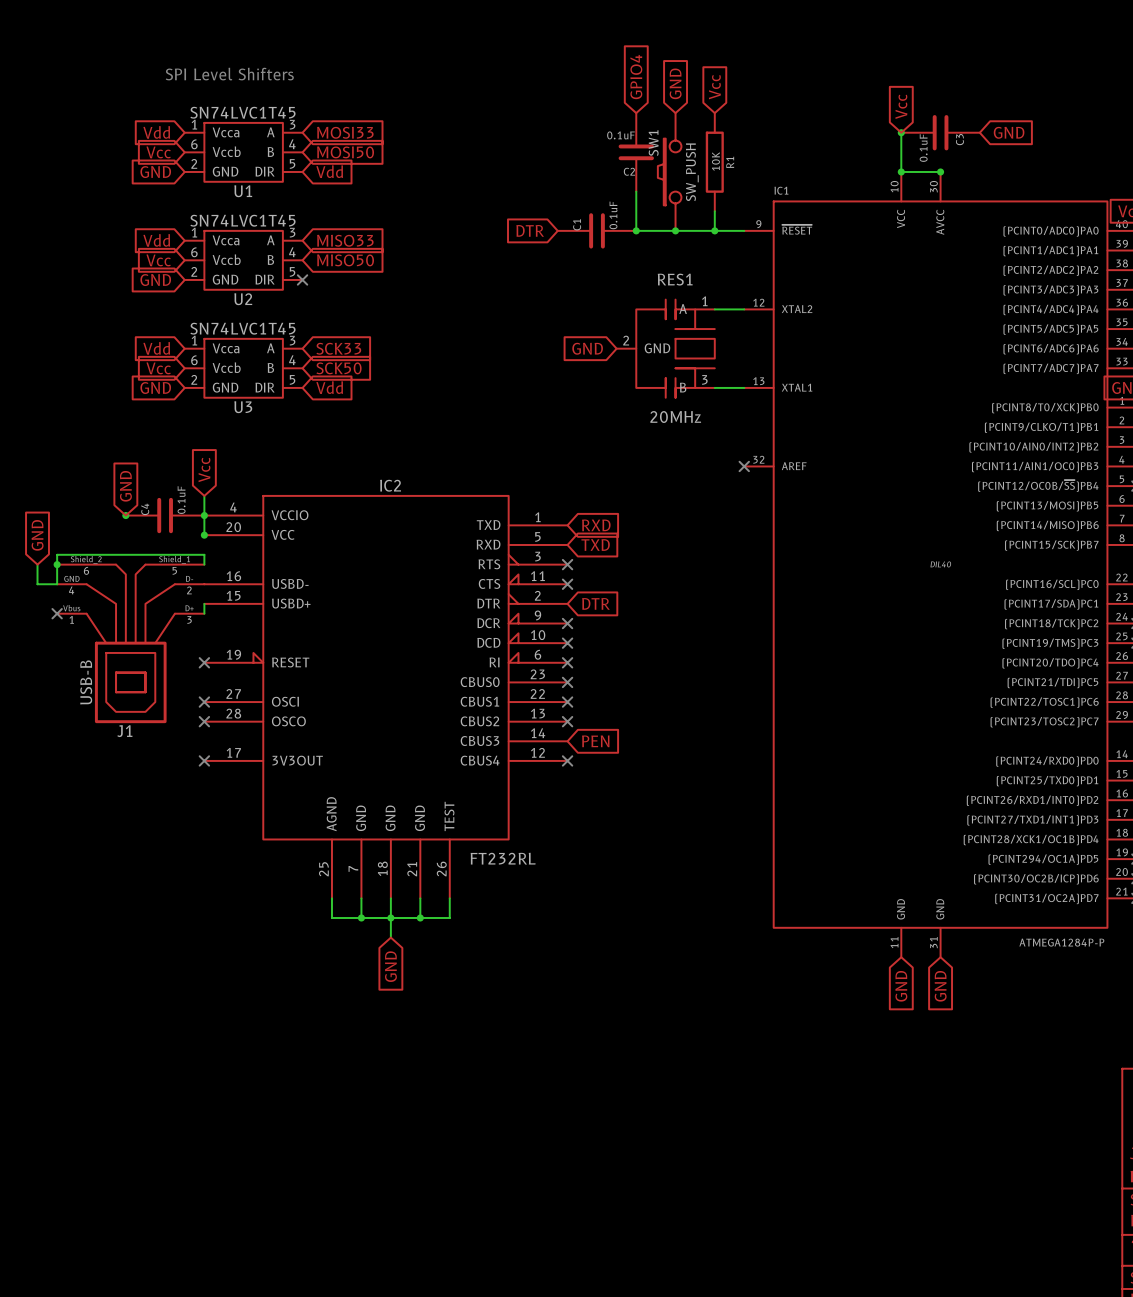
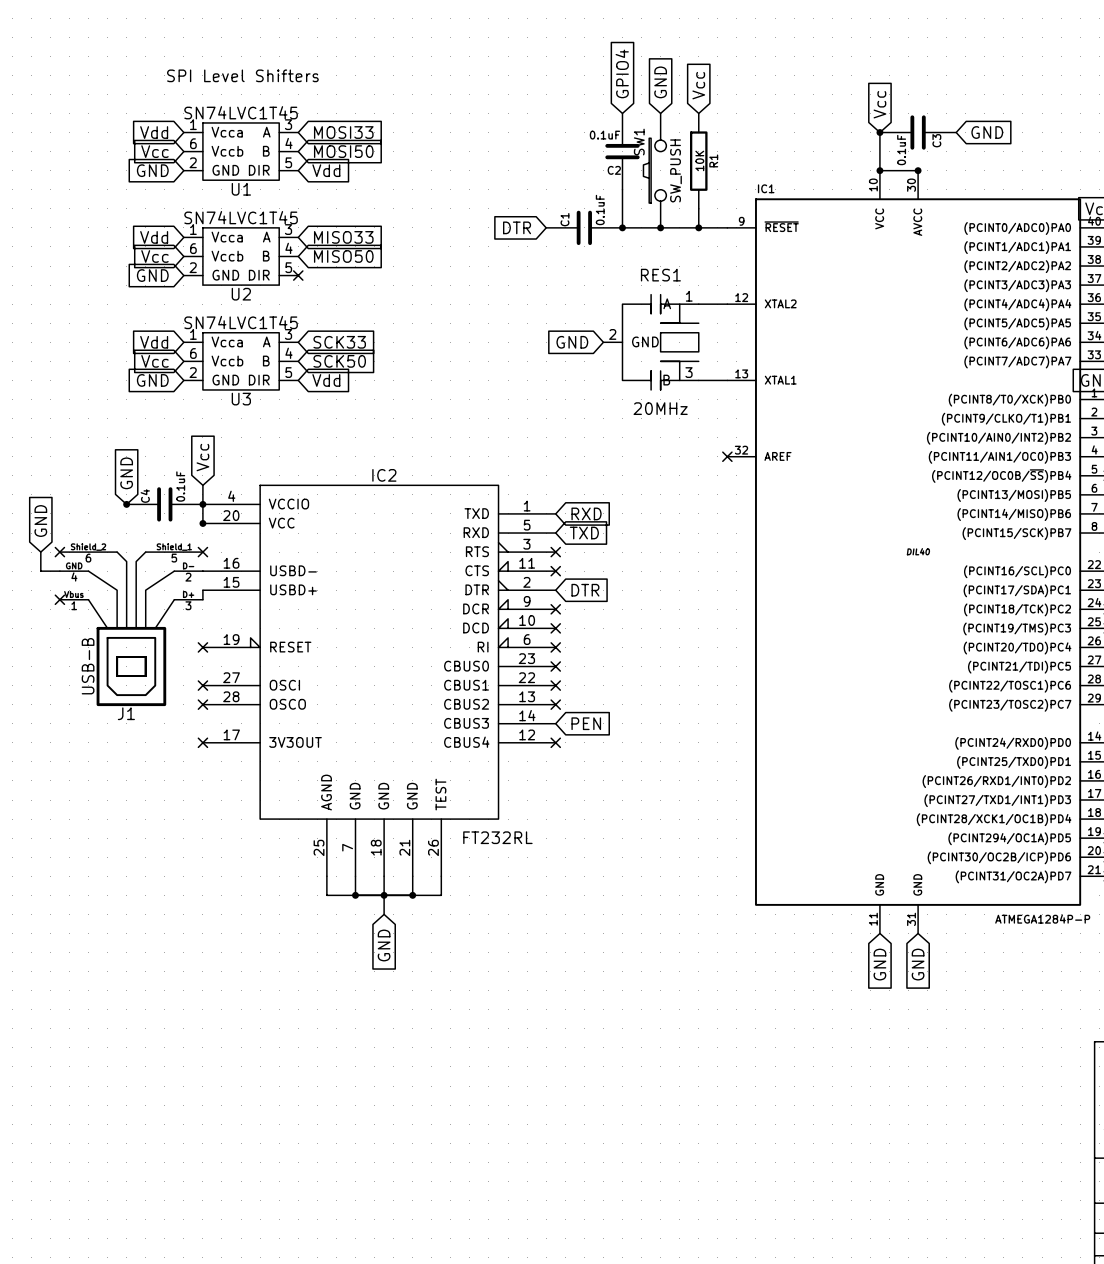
junction: (57, 564) -> none
no-connect mark: none -> (59, 552)
wire: (204, 564) (204, 554) (57, 554) (57, 584) -> none
no-connect mark: none -> (202, 552)

